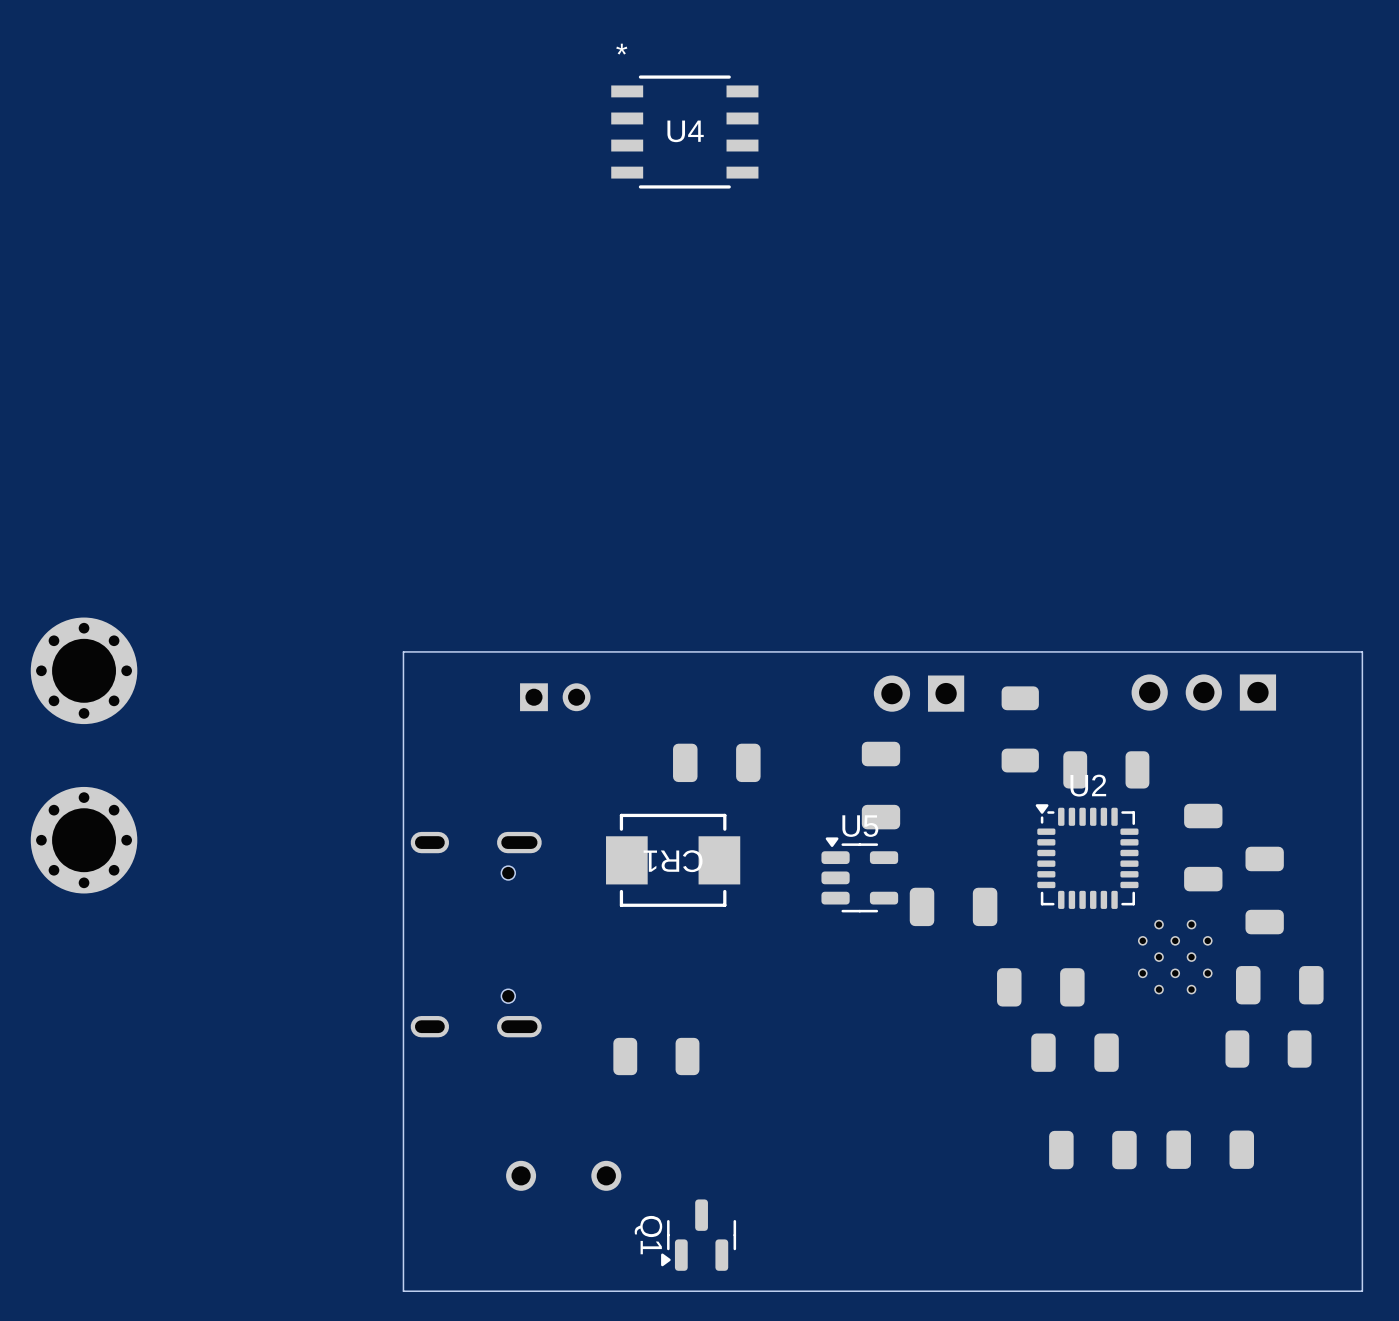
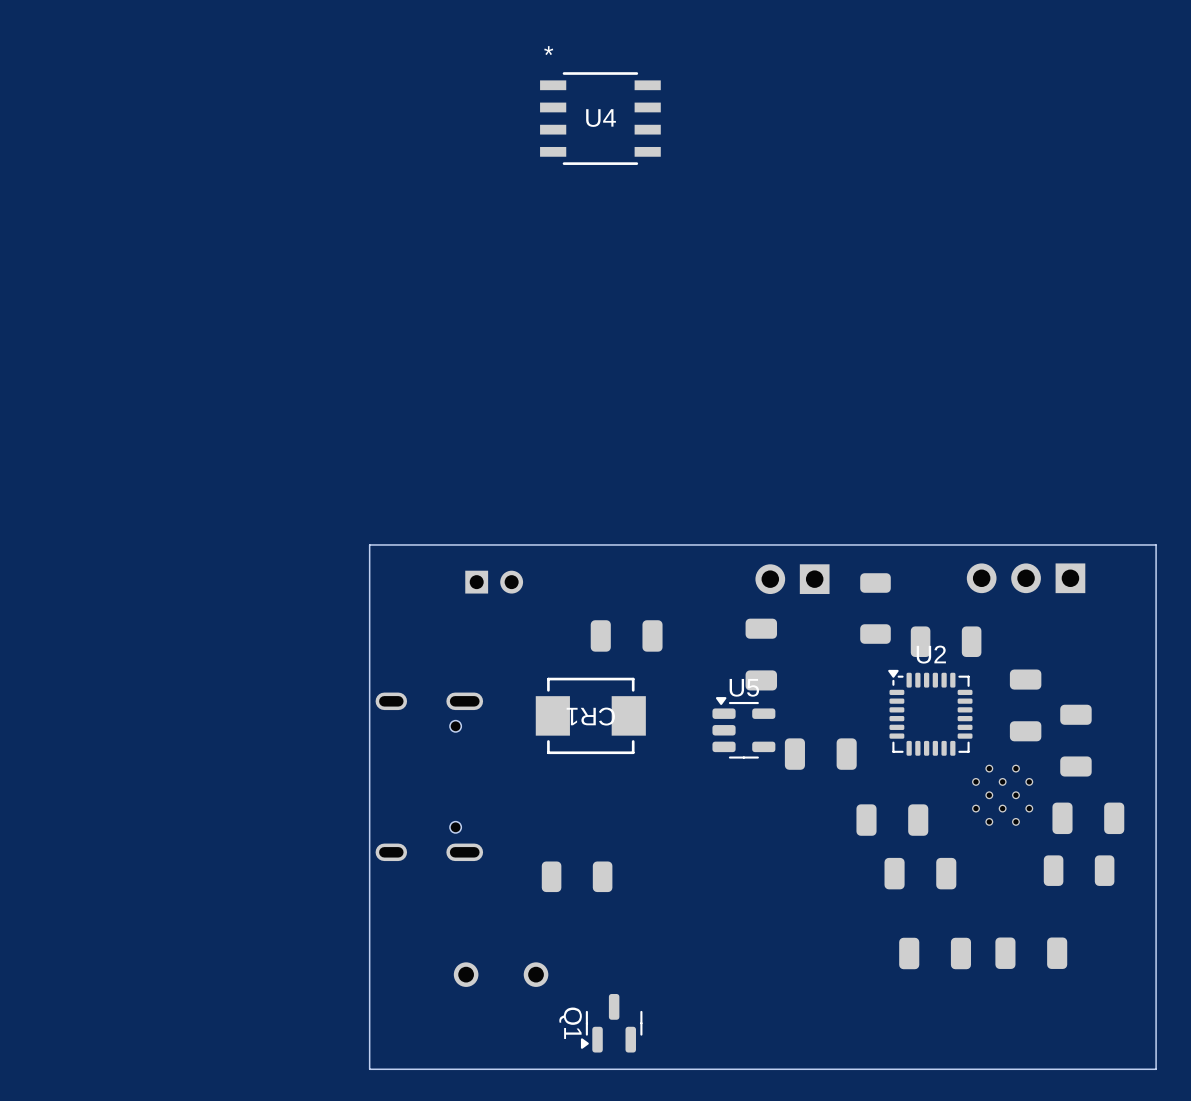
part: (84, 670) -> none
part: (84, 840) -> none

